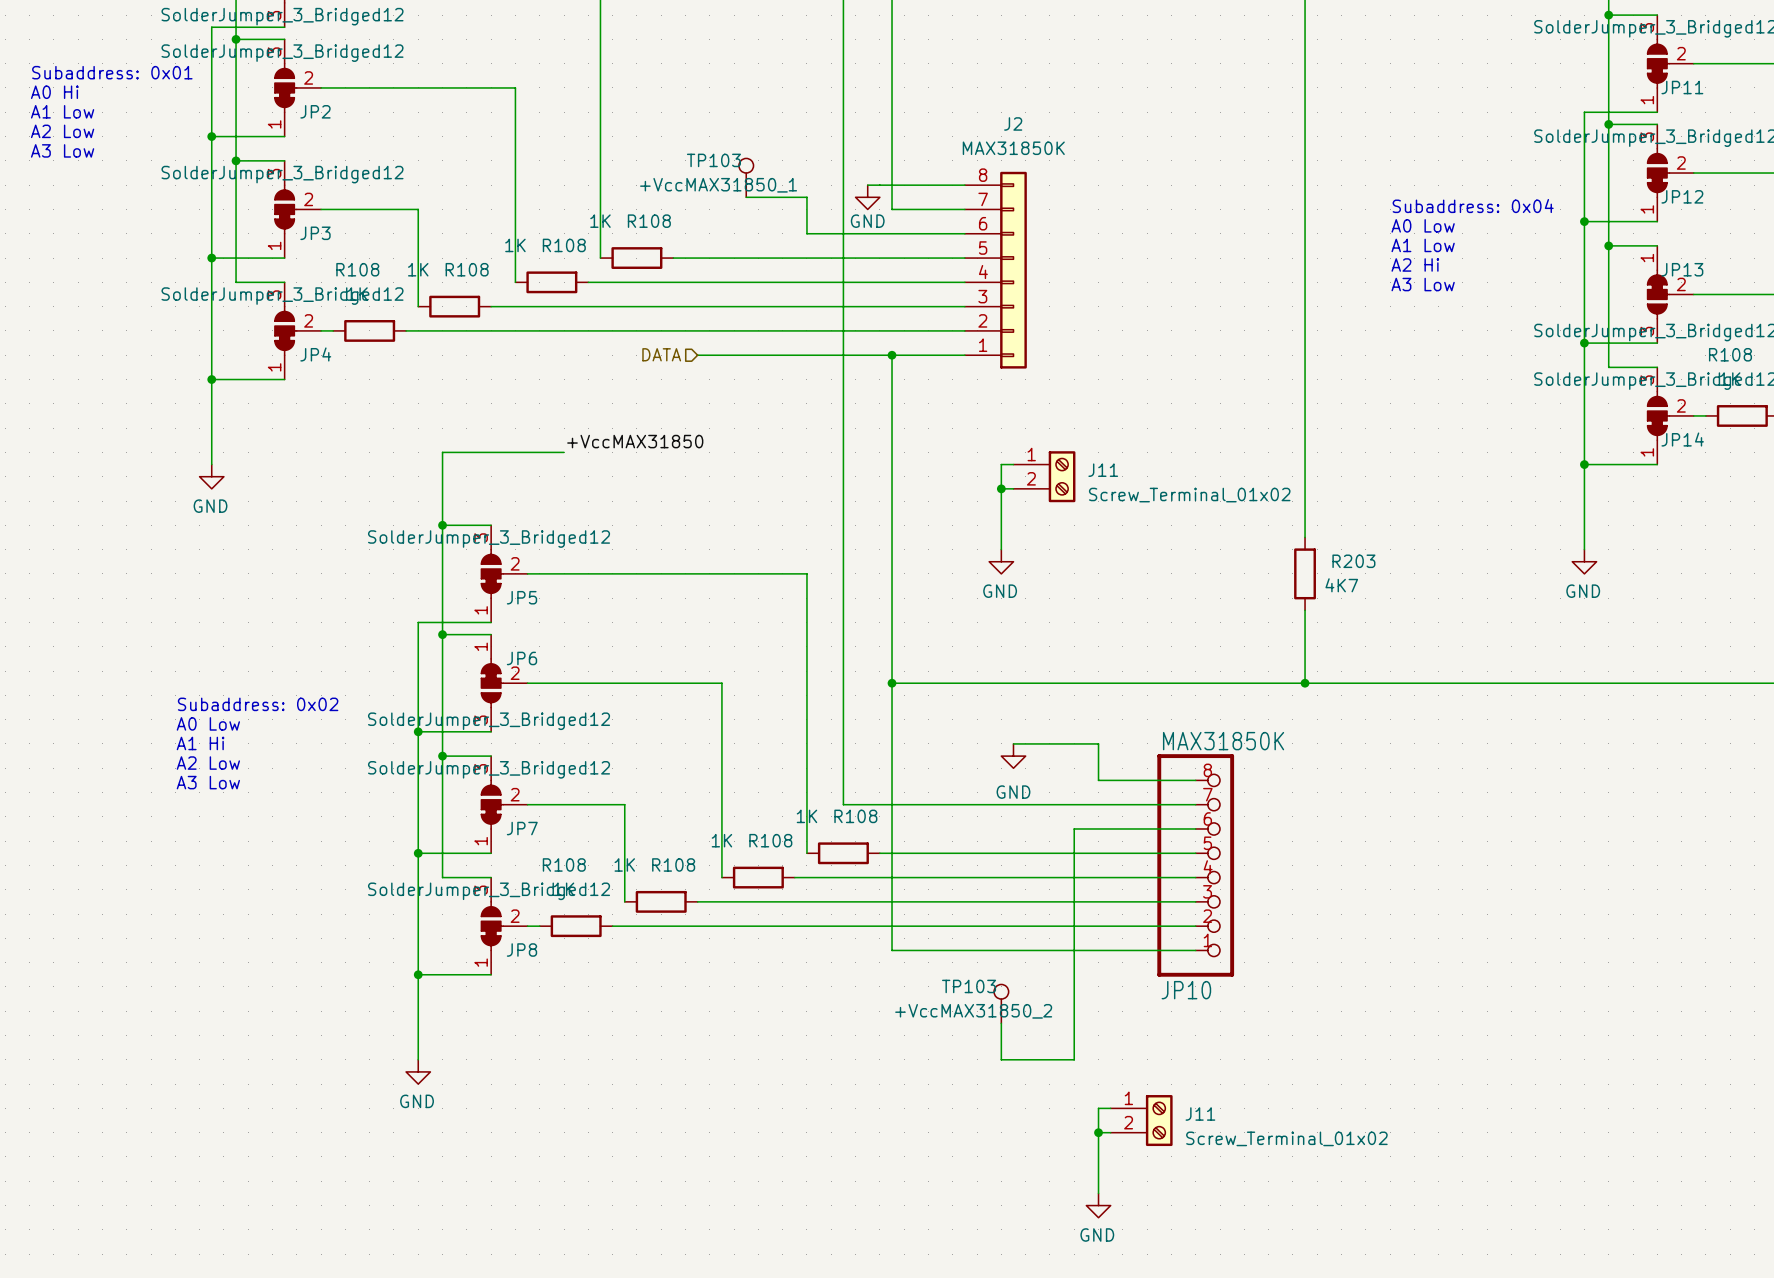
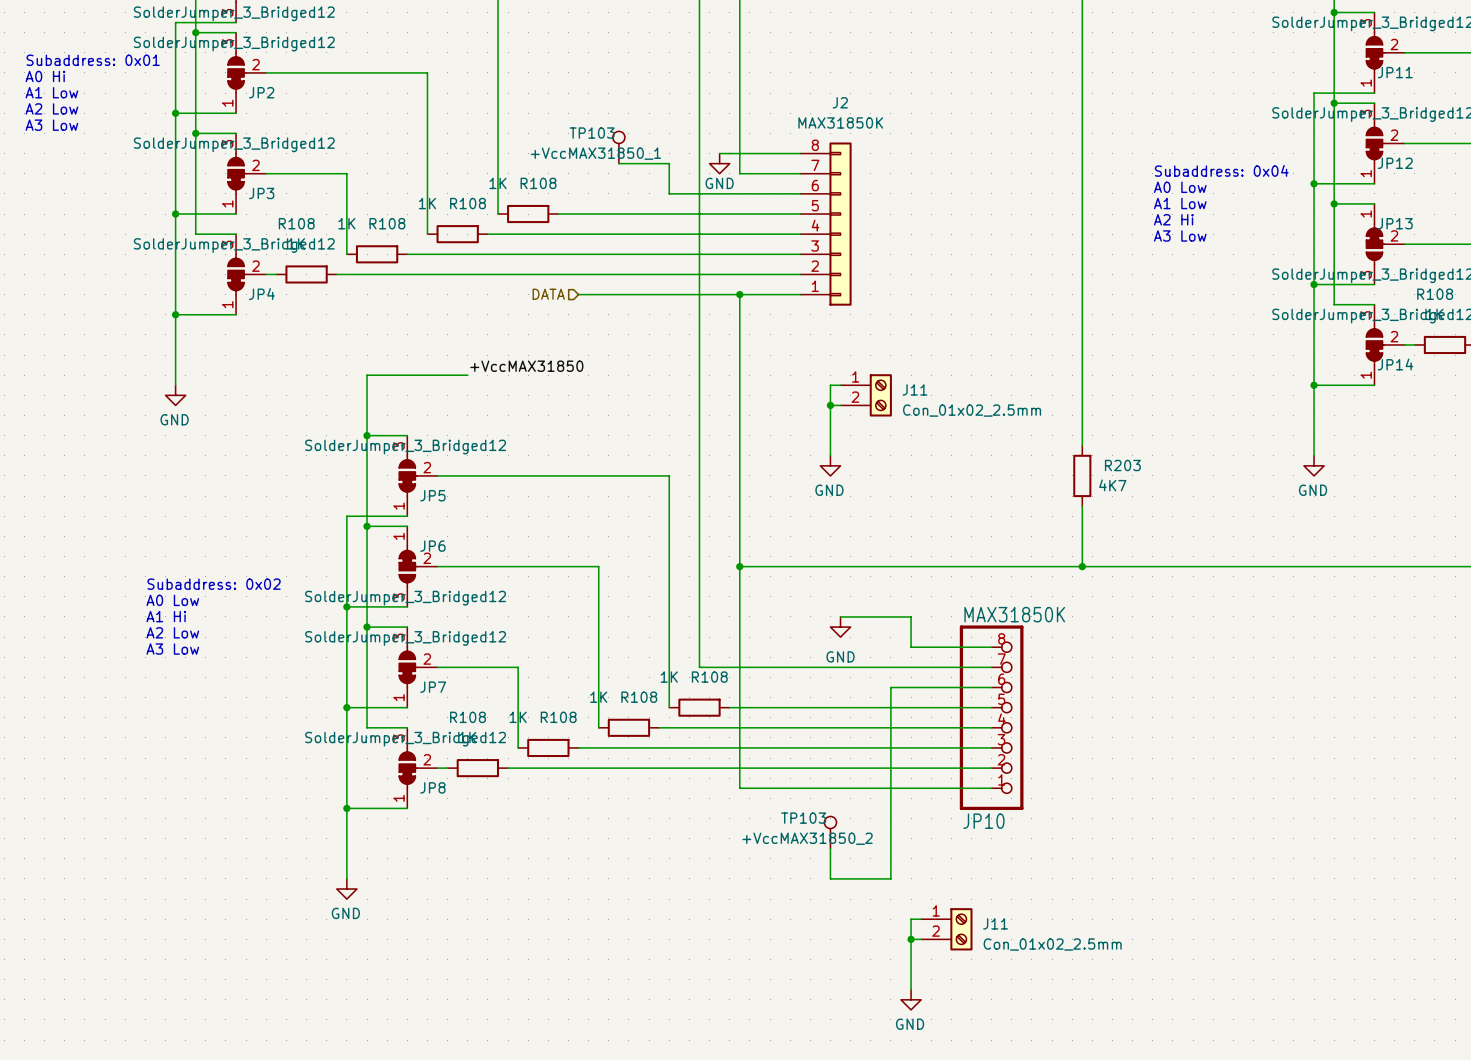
J11 value: Screw_Terminal_01x02 (1189, 495) -> Con_01x02_2.5mm (972, 410)
J11 value: Screw_Terminal_01x02 (1286, 1138) -> Con_01x02_2.5mm (1052, 944)

